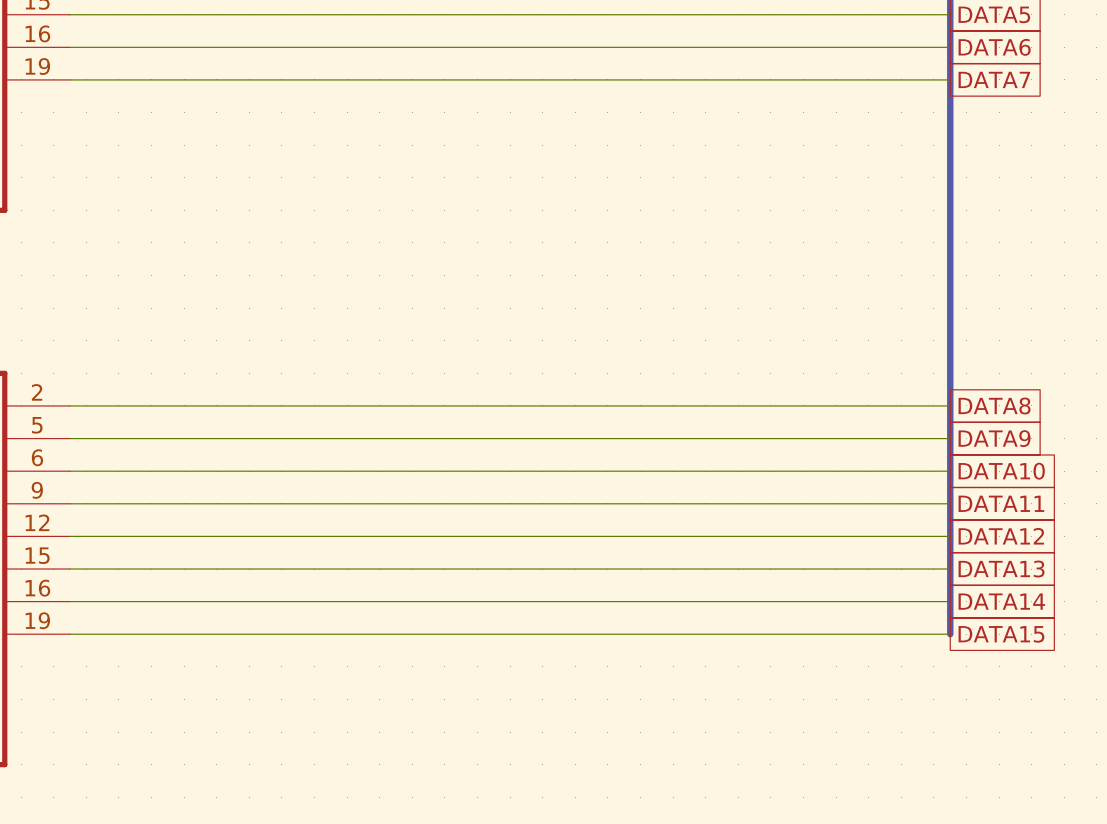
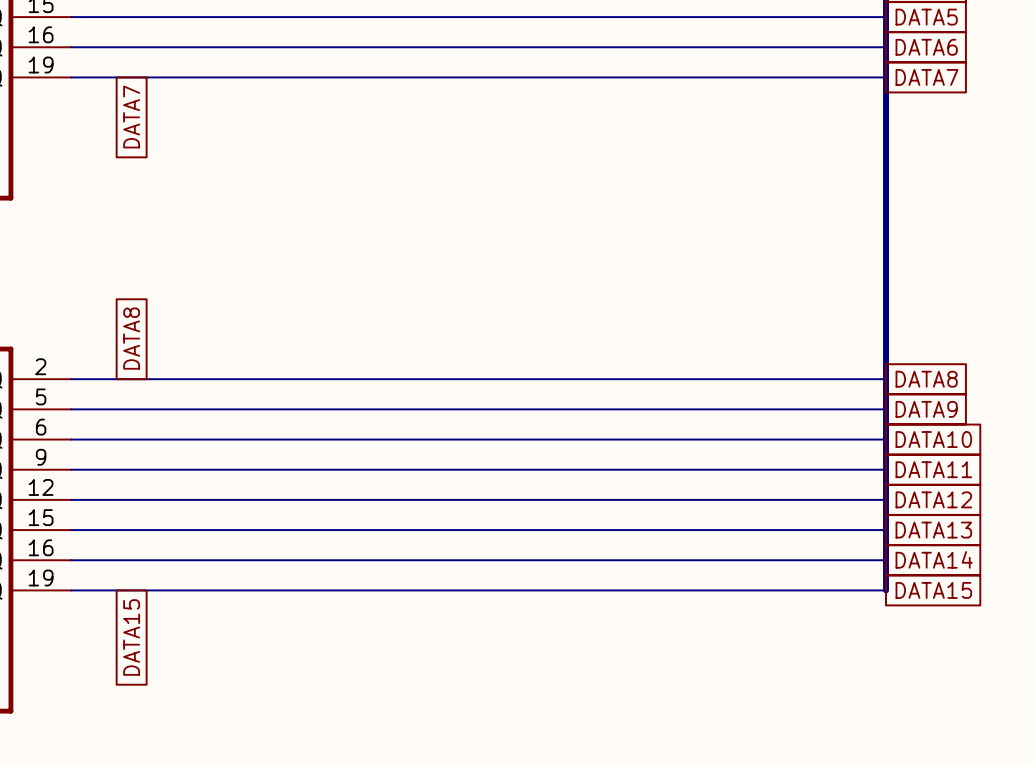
global label: none -> DATA7 (131, 116)
global label: none -> DATA8 (131, 338)
global label: none -> DATA15 (131, 637)

